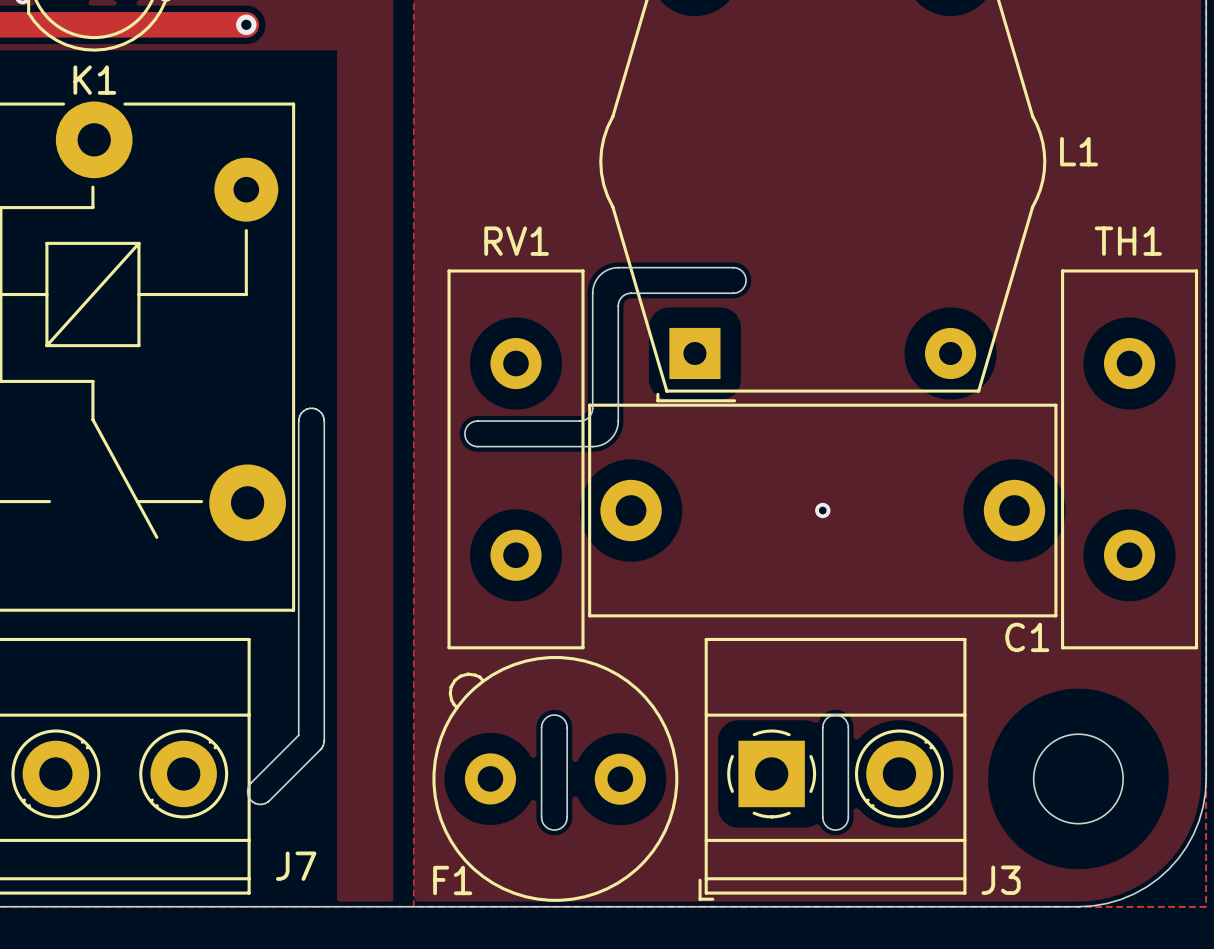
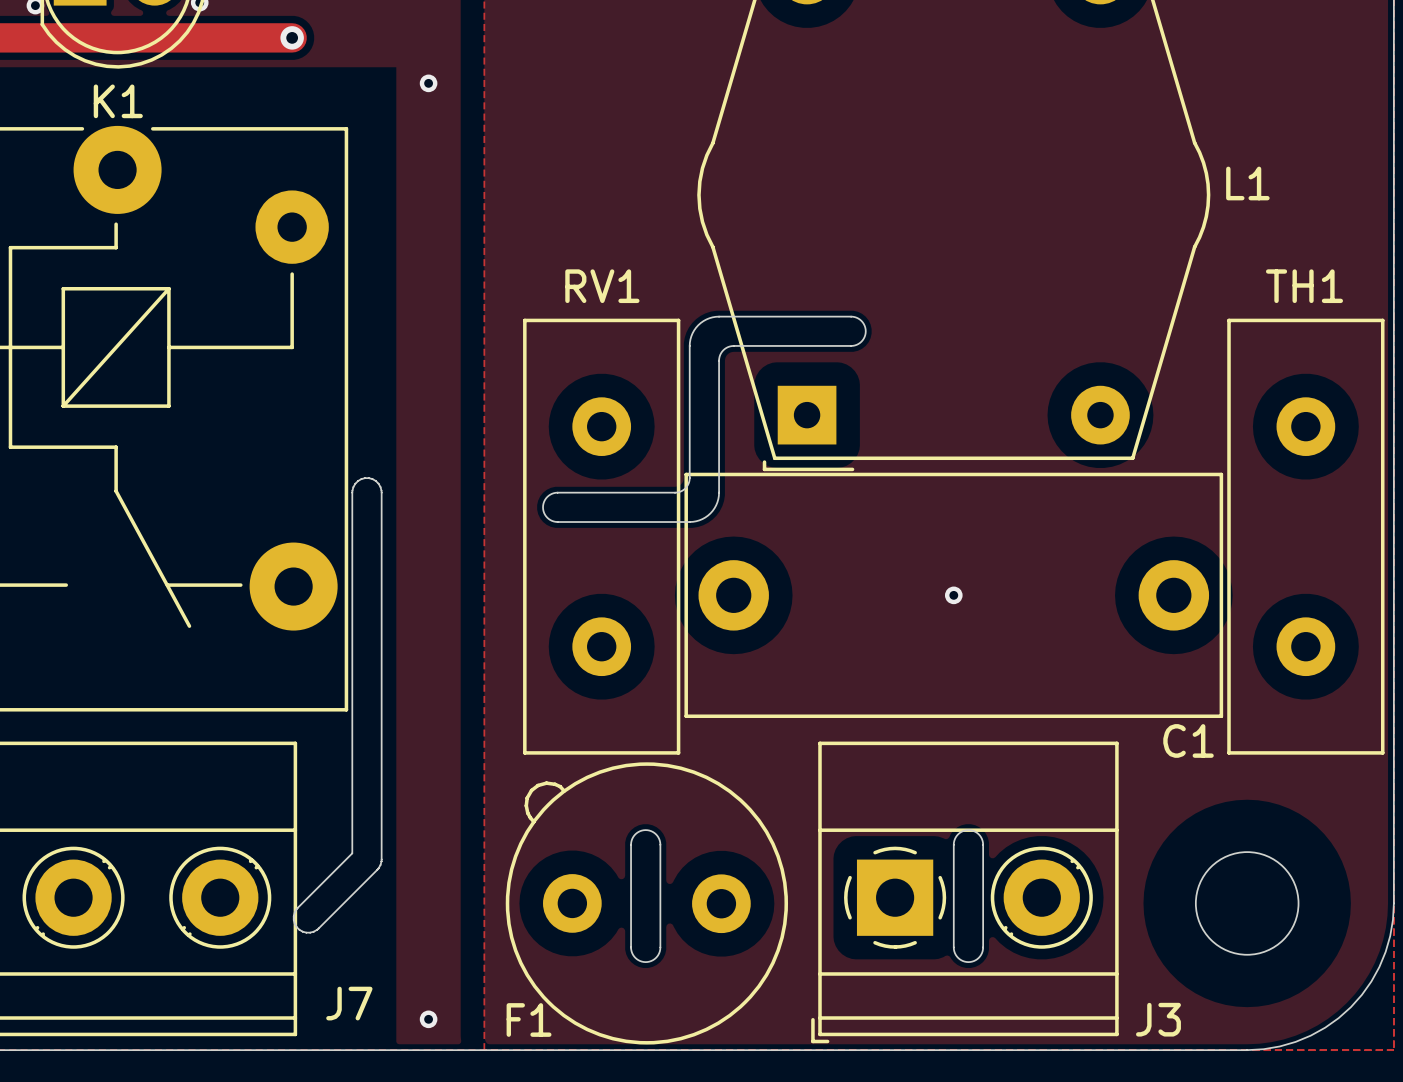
via: none -> (428, 83)
via: none -> (428, 1019)

